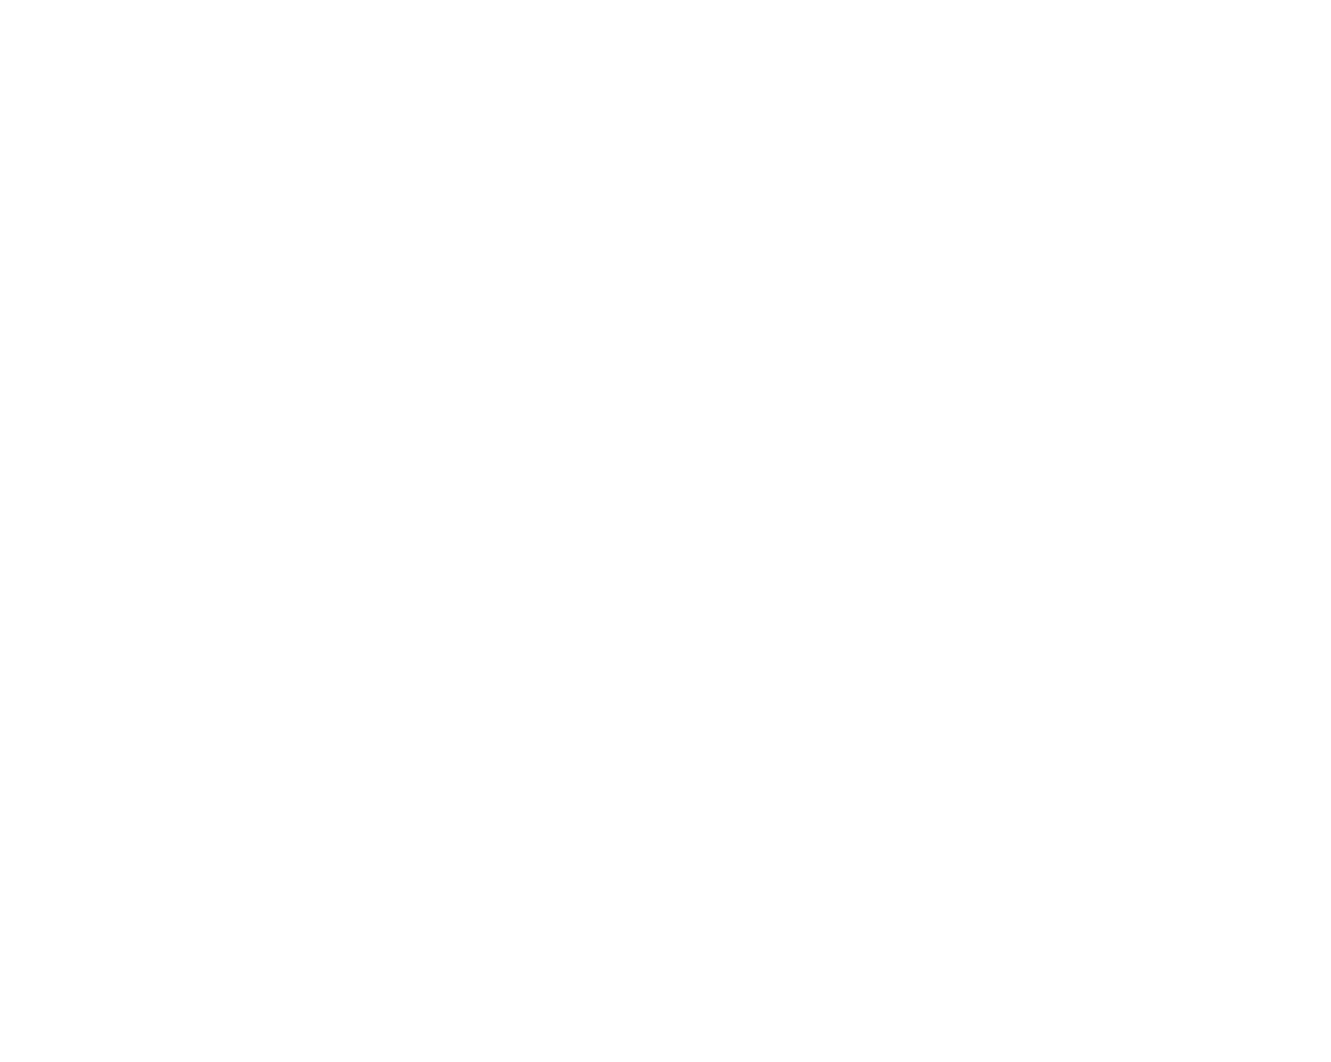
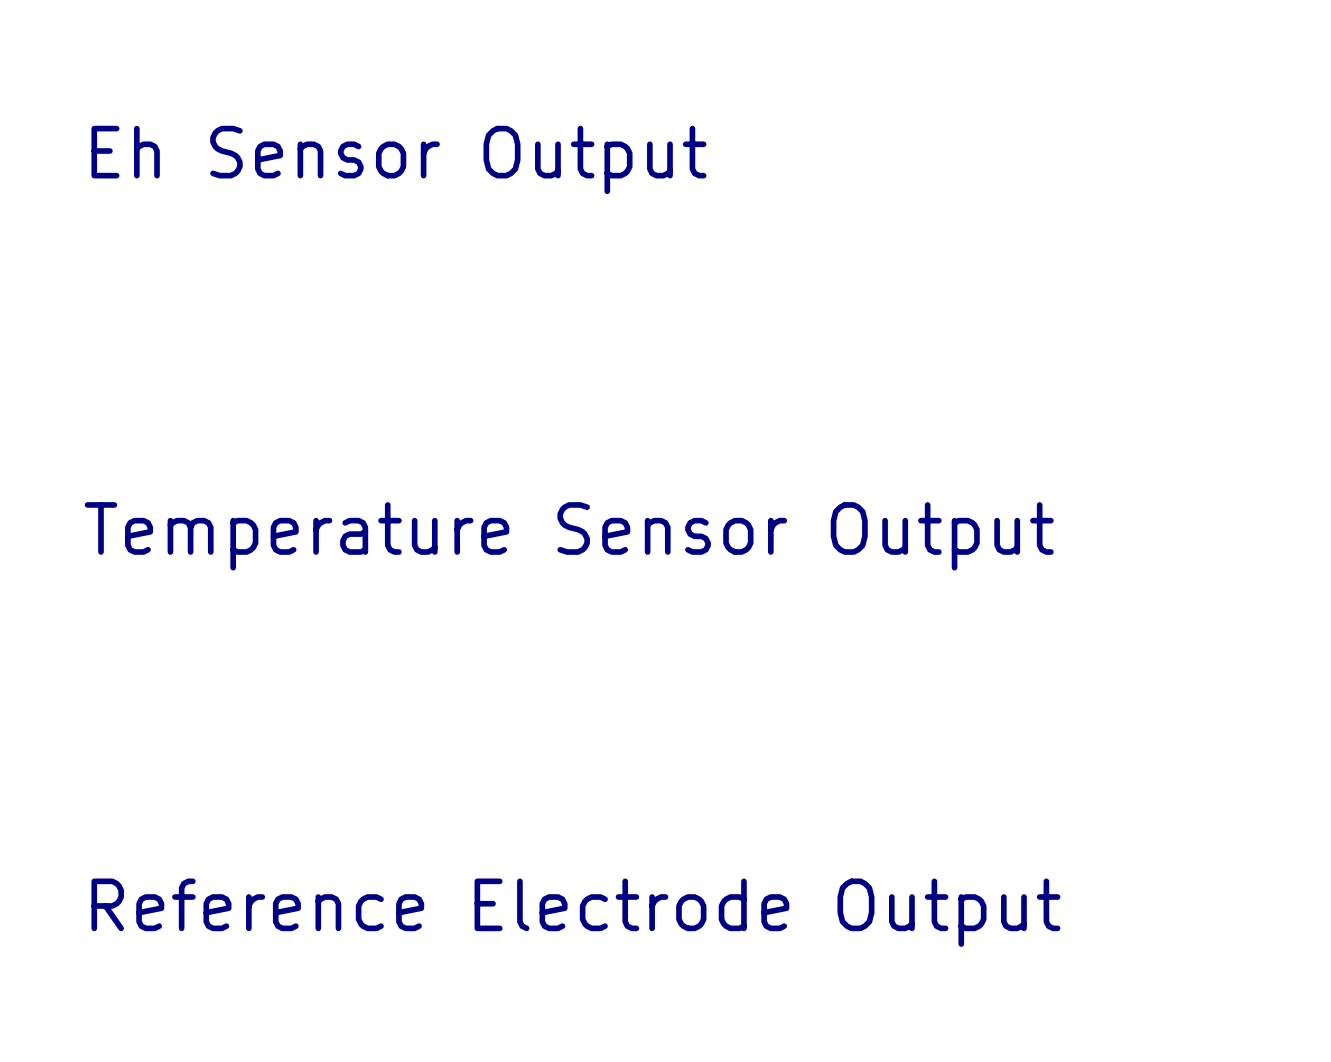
text: none -> Eh Sensor Output (398, 159)
text: none -> Temperature Sensor Output (569, 536)
text: none -> Reference Electrode Output (575, 912)

